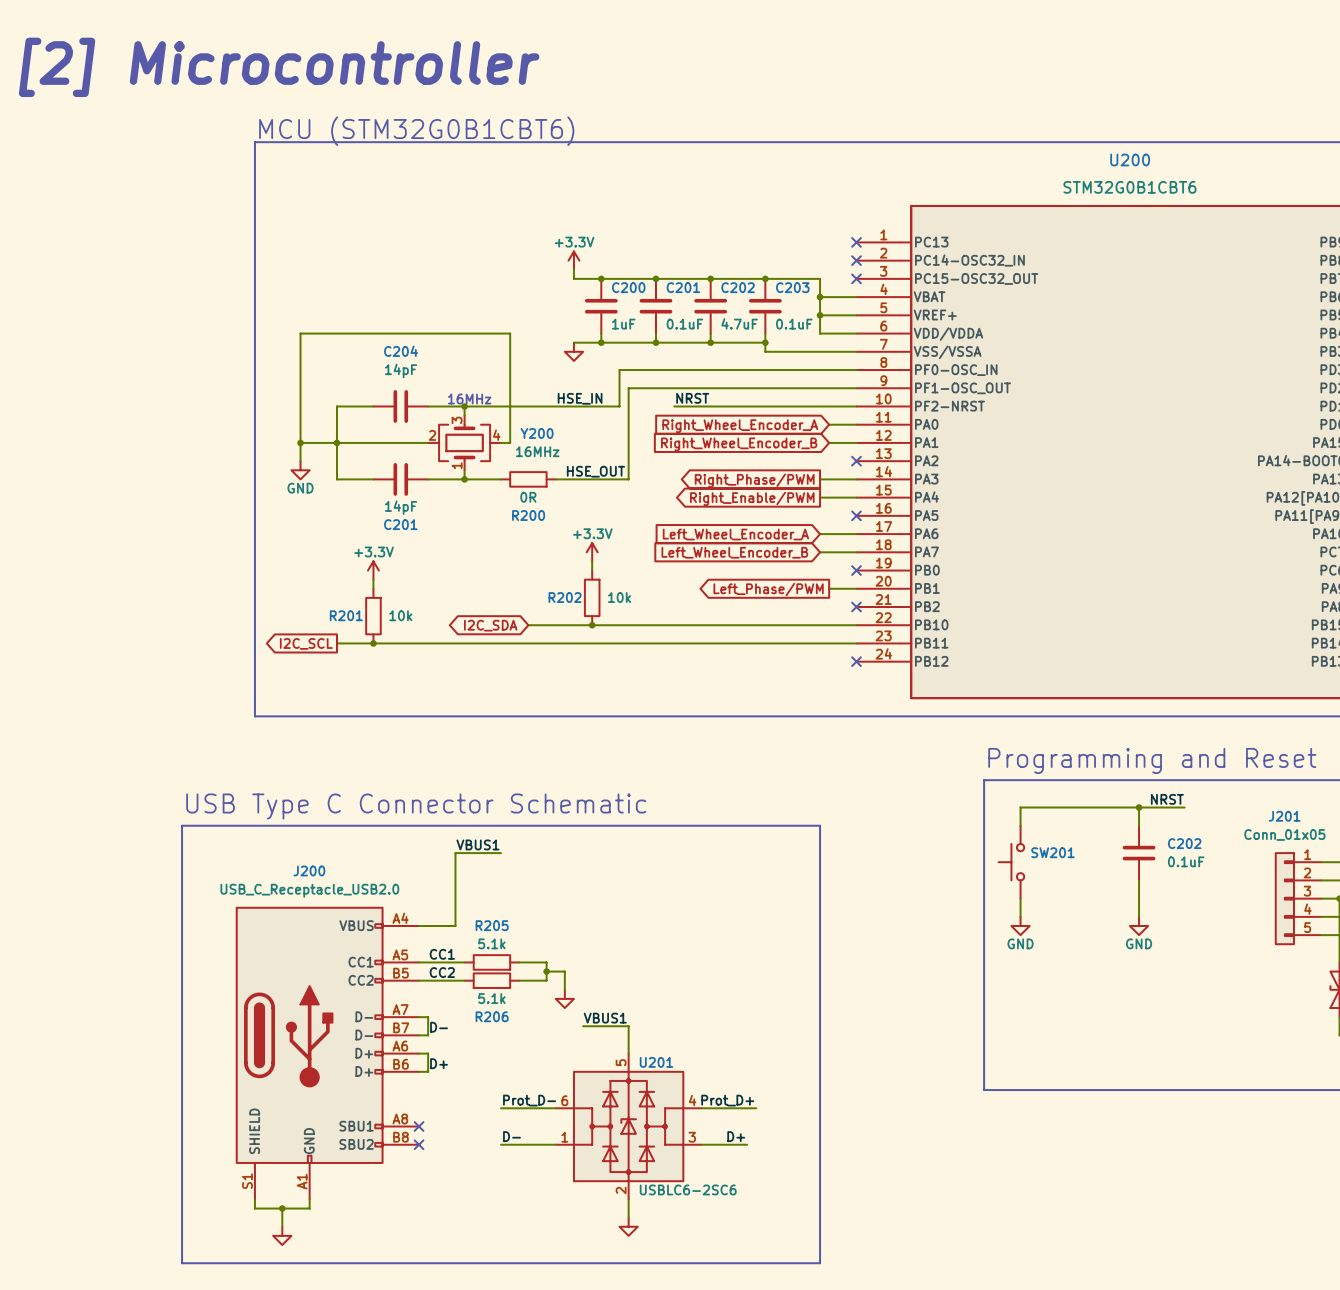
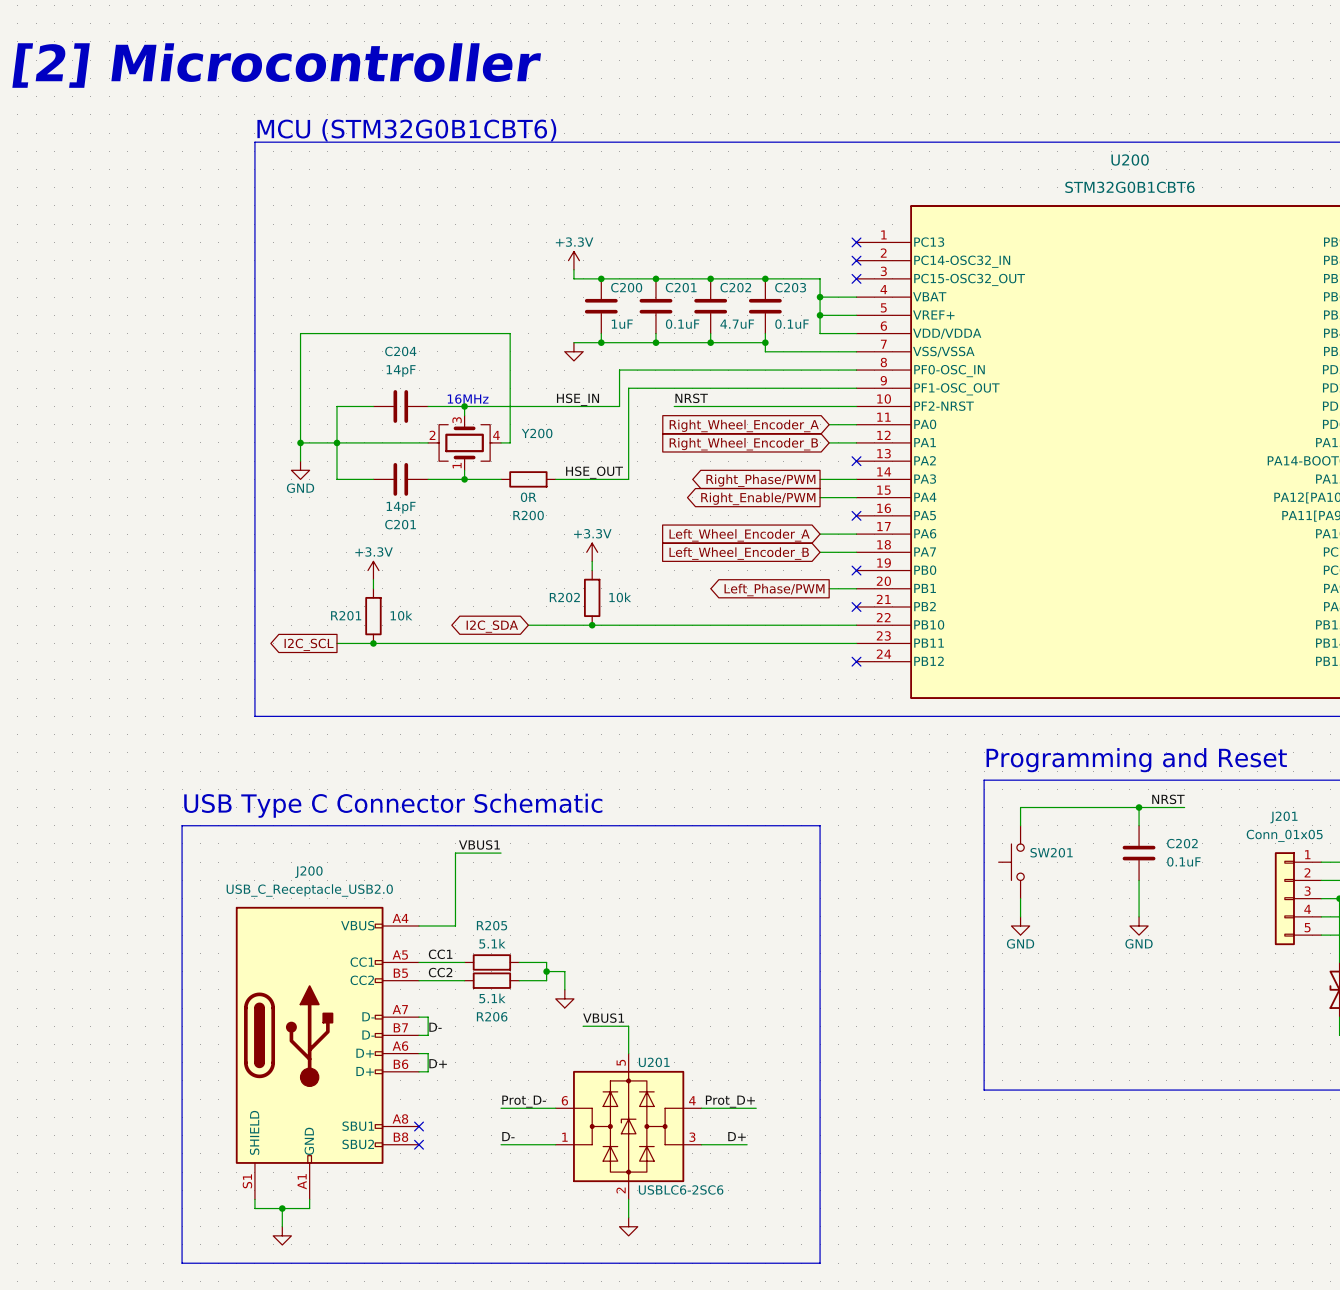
Y200 value: 16MHz (537, 451) -> none

